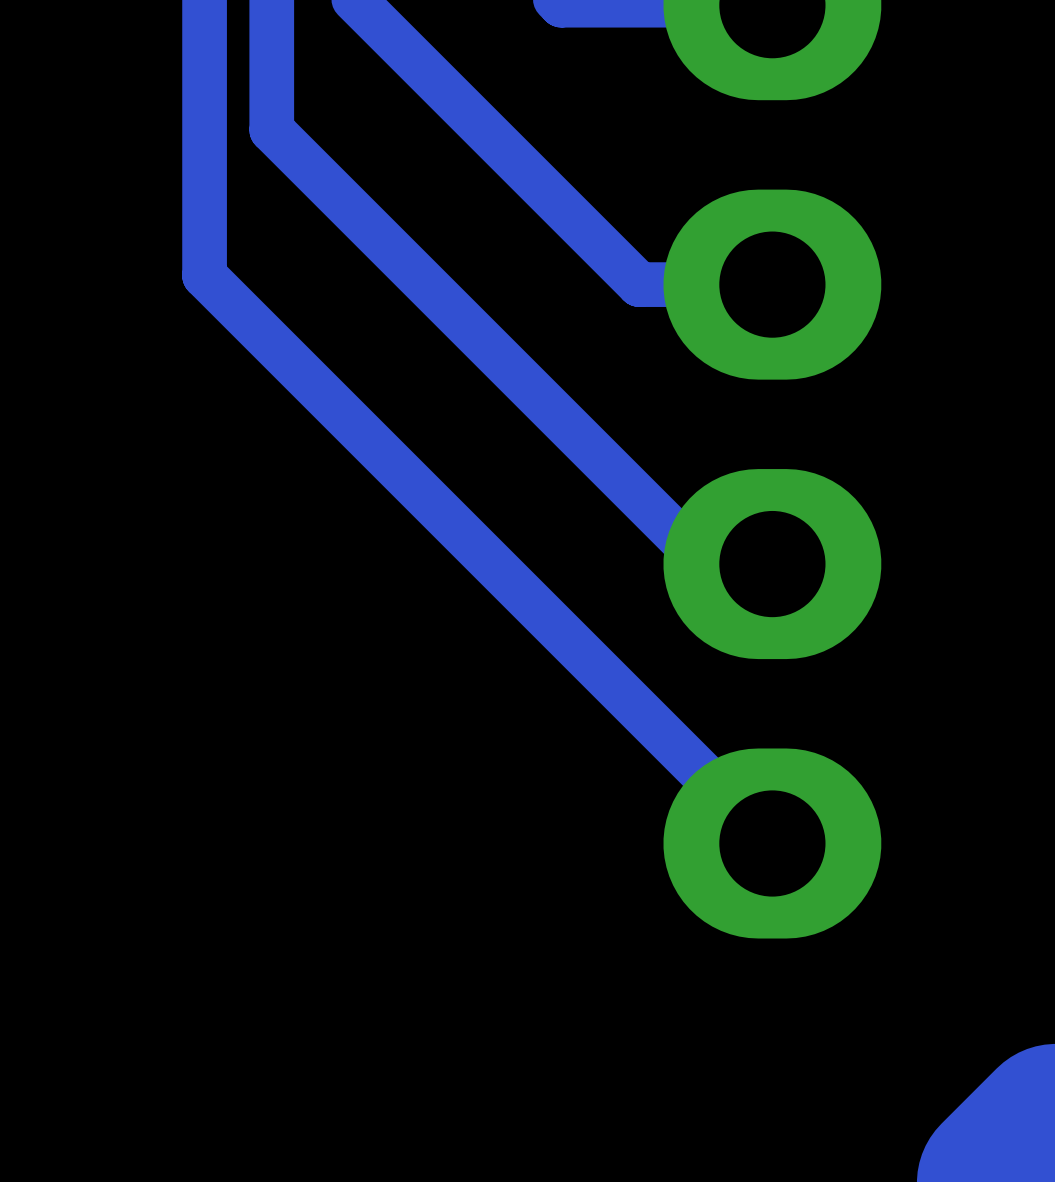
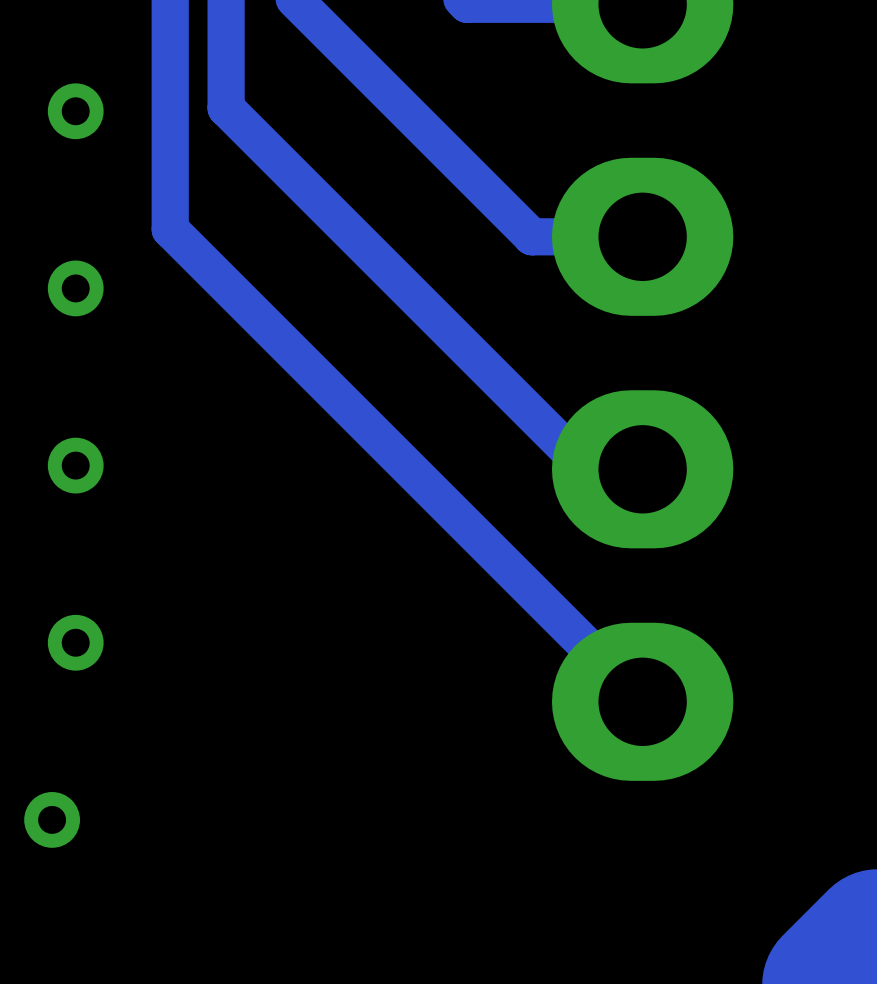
via: none -> (75, 111)
via: none -> (75, 288)
via: none -> (75, 465)
via: none -> (75, 642)
via: none -> (52, 819)

